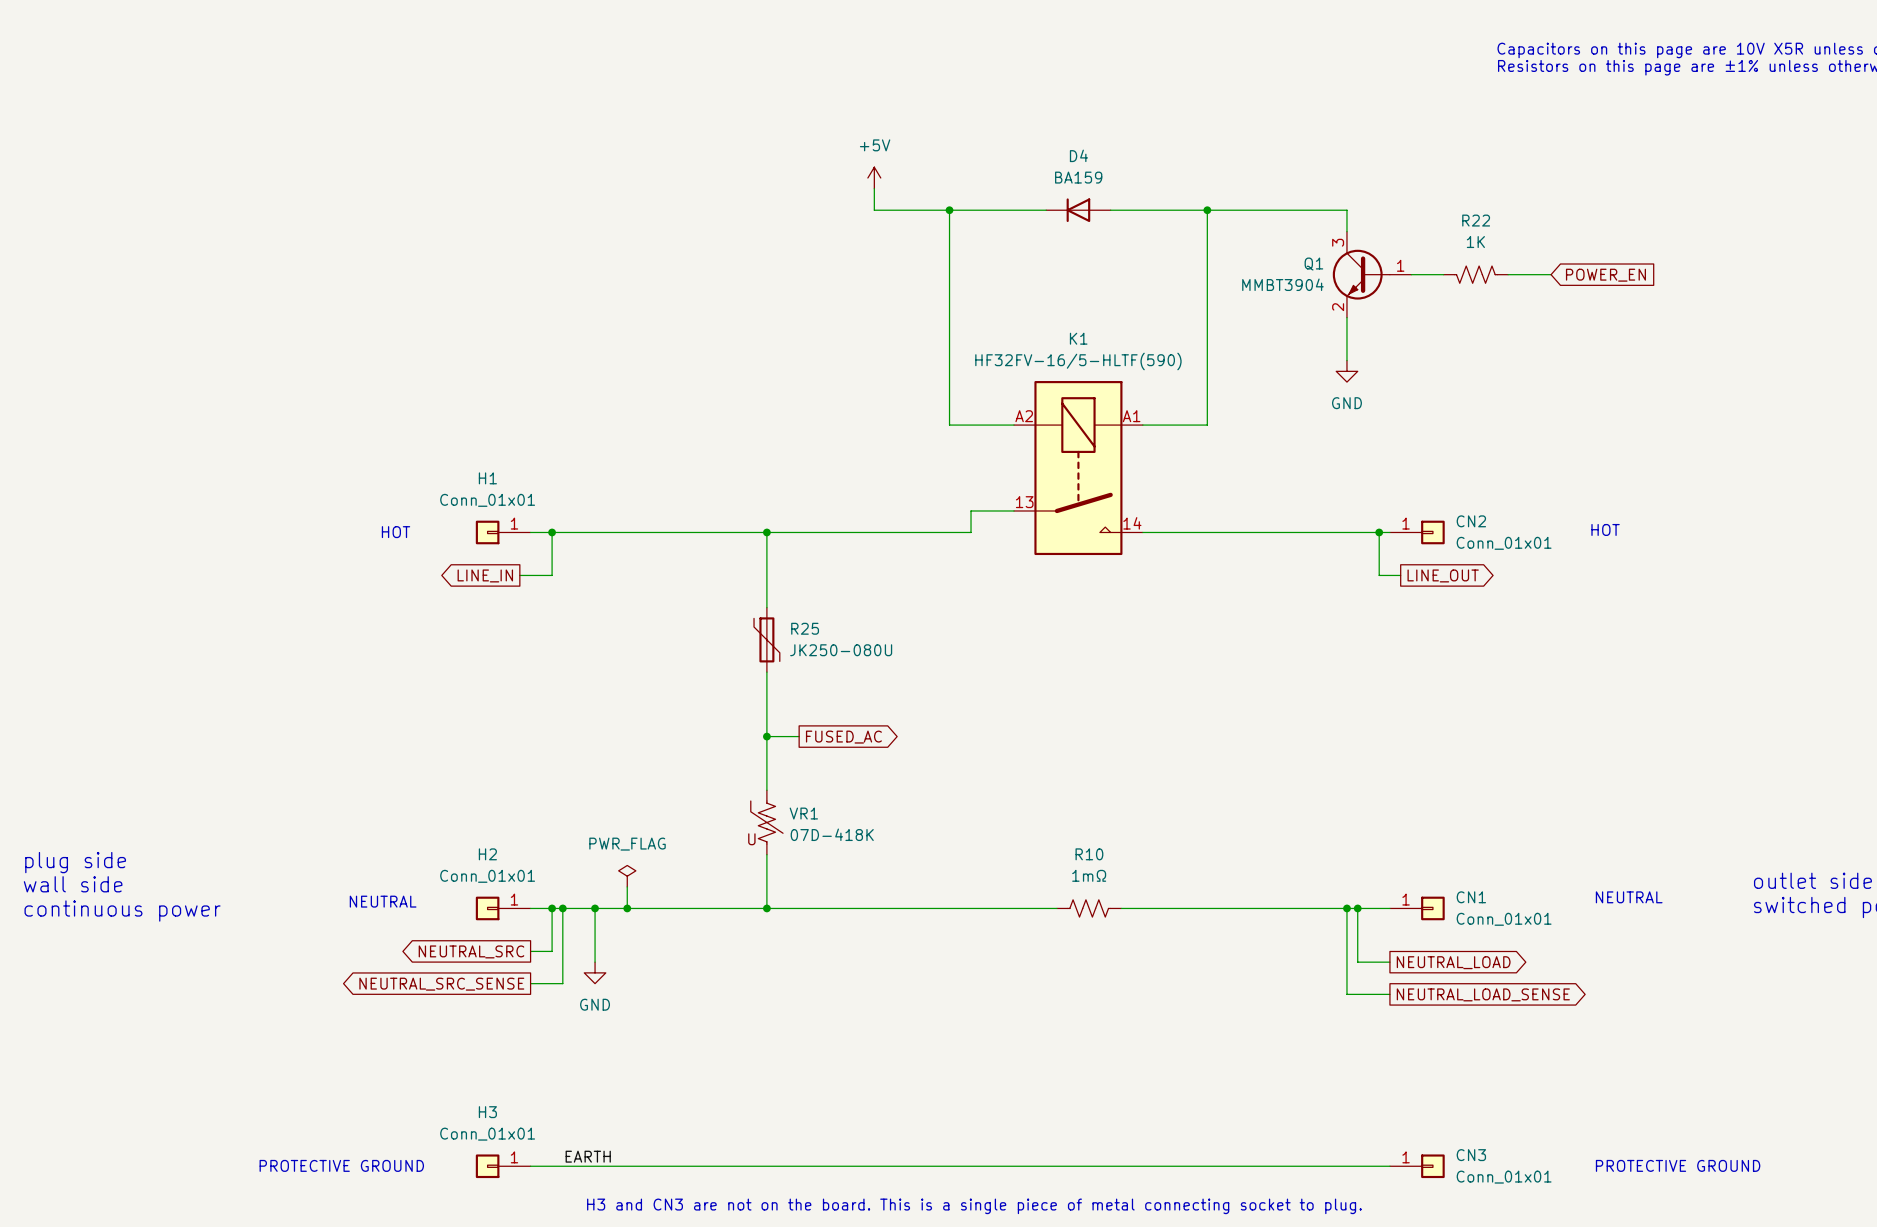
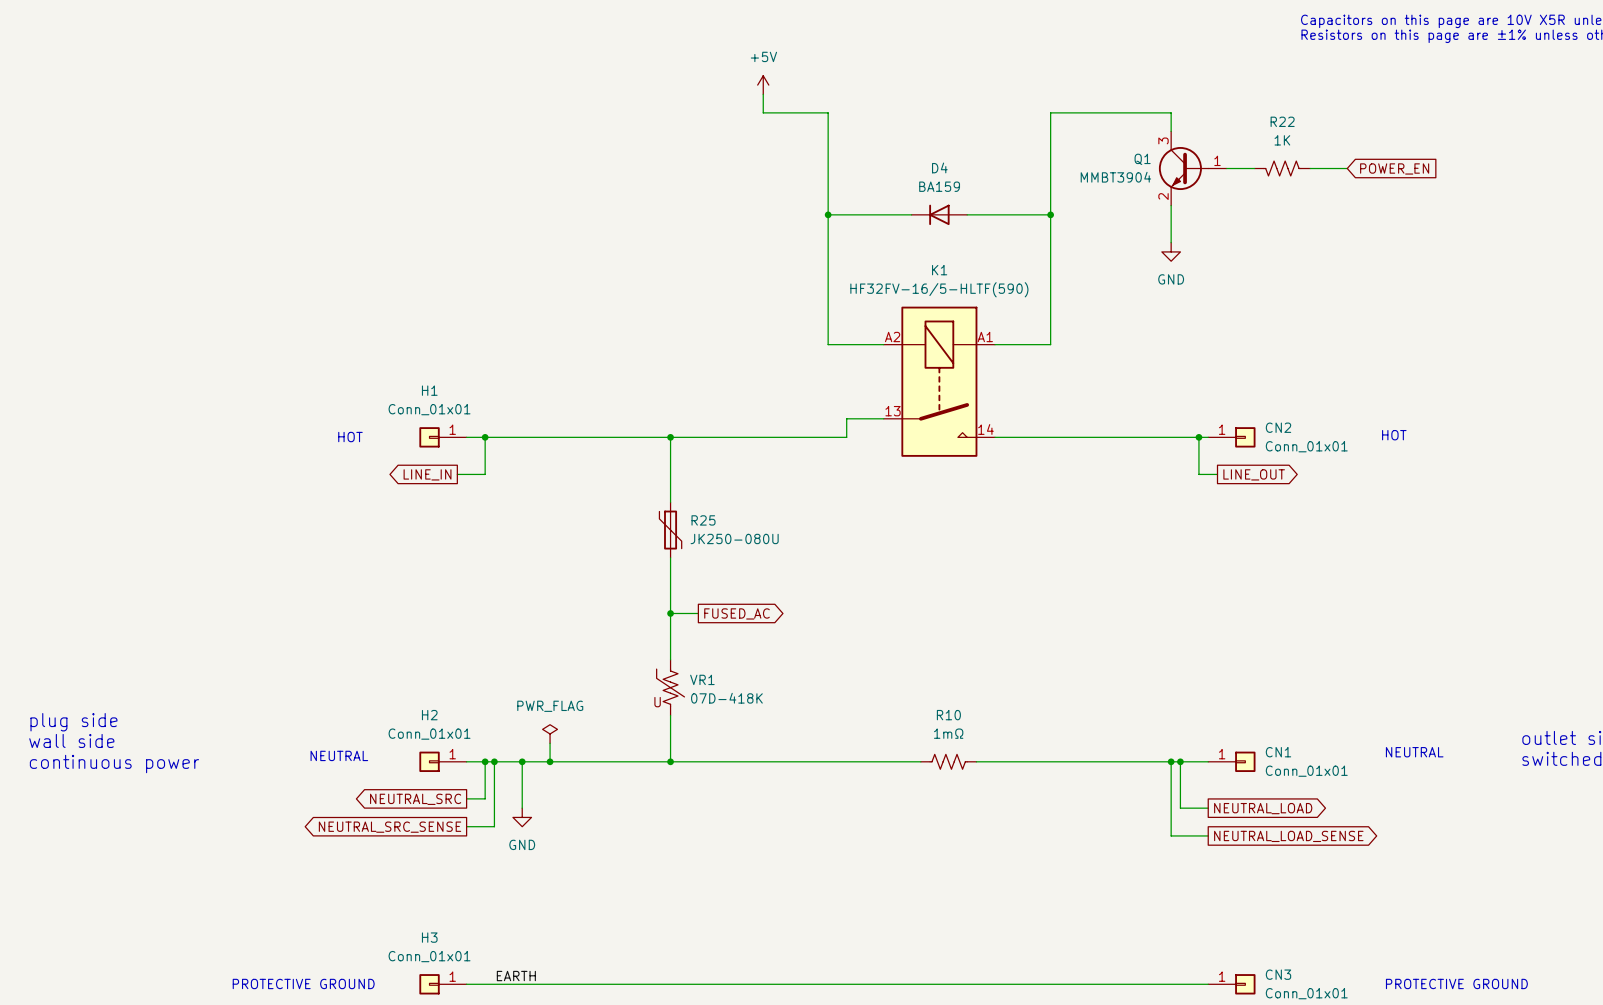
wire: none -> (763, 94) (763, 112) (828, 112) (828, 159)
power symbol position: +5V (874, 177) -> +5V (763, 85)
wire: none -> (1171, 131) (1171, 112) (1050, 112) (1050, 159)
wire: (874, 188) (874, 210) (1046, 210) -> none
junction: (949, 210) -> none
D4 position: (1078, 210) -> (939, 214)
wire: (1110, 210) (1346, 210) (1346, 231) -> none
junction: (1207, 210) -> none
wire: none -> (828, 214) (911, 214)
junction: none -> (828, 214)
wire: none -> (967, 214) (1050, 214)
junction: none -> (1050, 214)
Q1 position: (1372, 274) -> (1192, 168)
wire: (1411, 274) (1443, 274) -> (1226, 168) (1254, 168)
R22 position: (1475, 274) -> (1282, 168)
wire: (1508, 274) (1551, 274) -> (1310, 168) (1347, 168)
global label position: POWER_EN (1605, 275) -> POWER_EN (1394, 168)
wire: (1346, 317) (1346, 360) -> (1171, 205) (1171, 242)
power symbol position: GND (1346, 371) -> GND (1171, 251)

